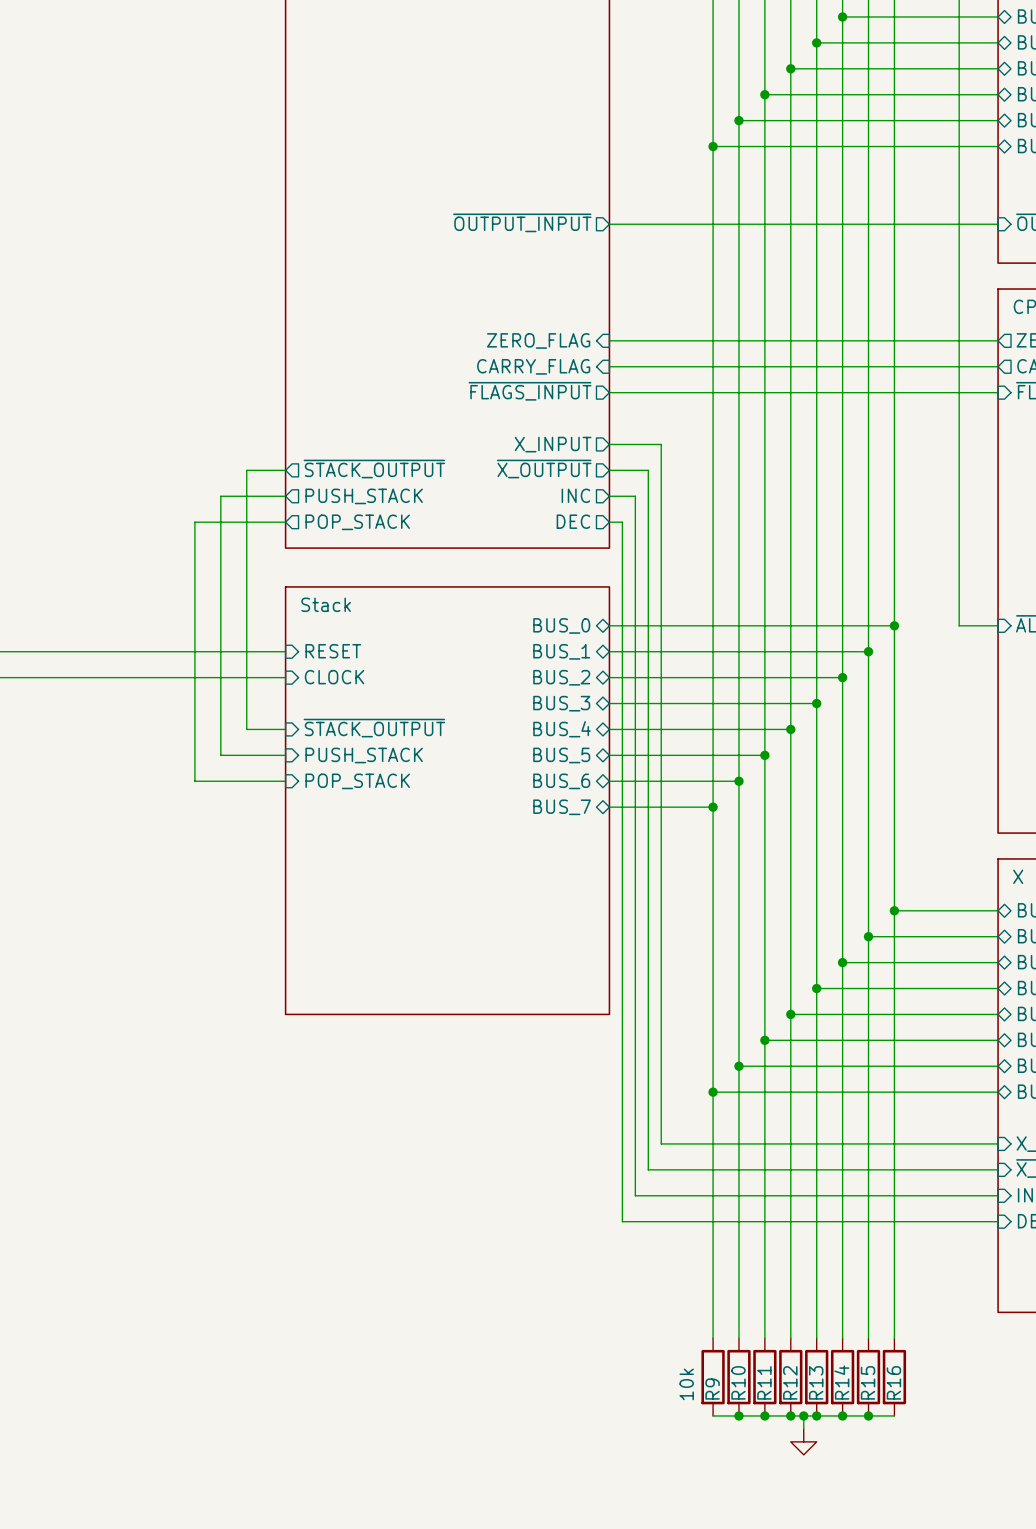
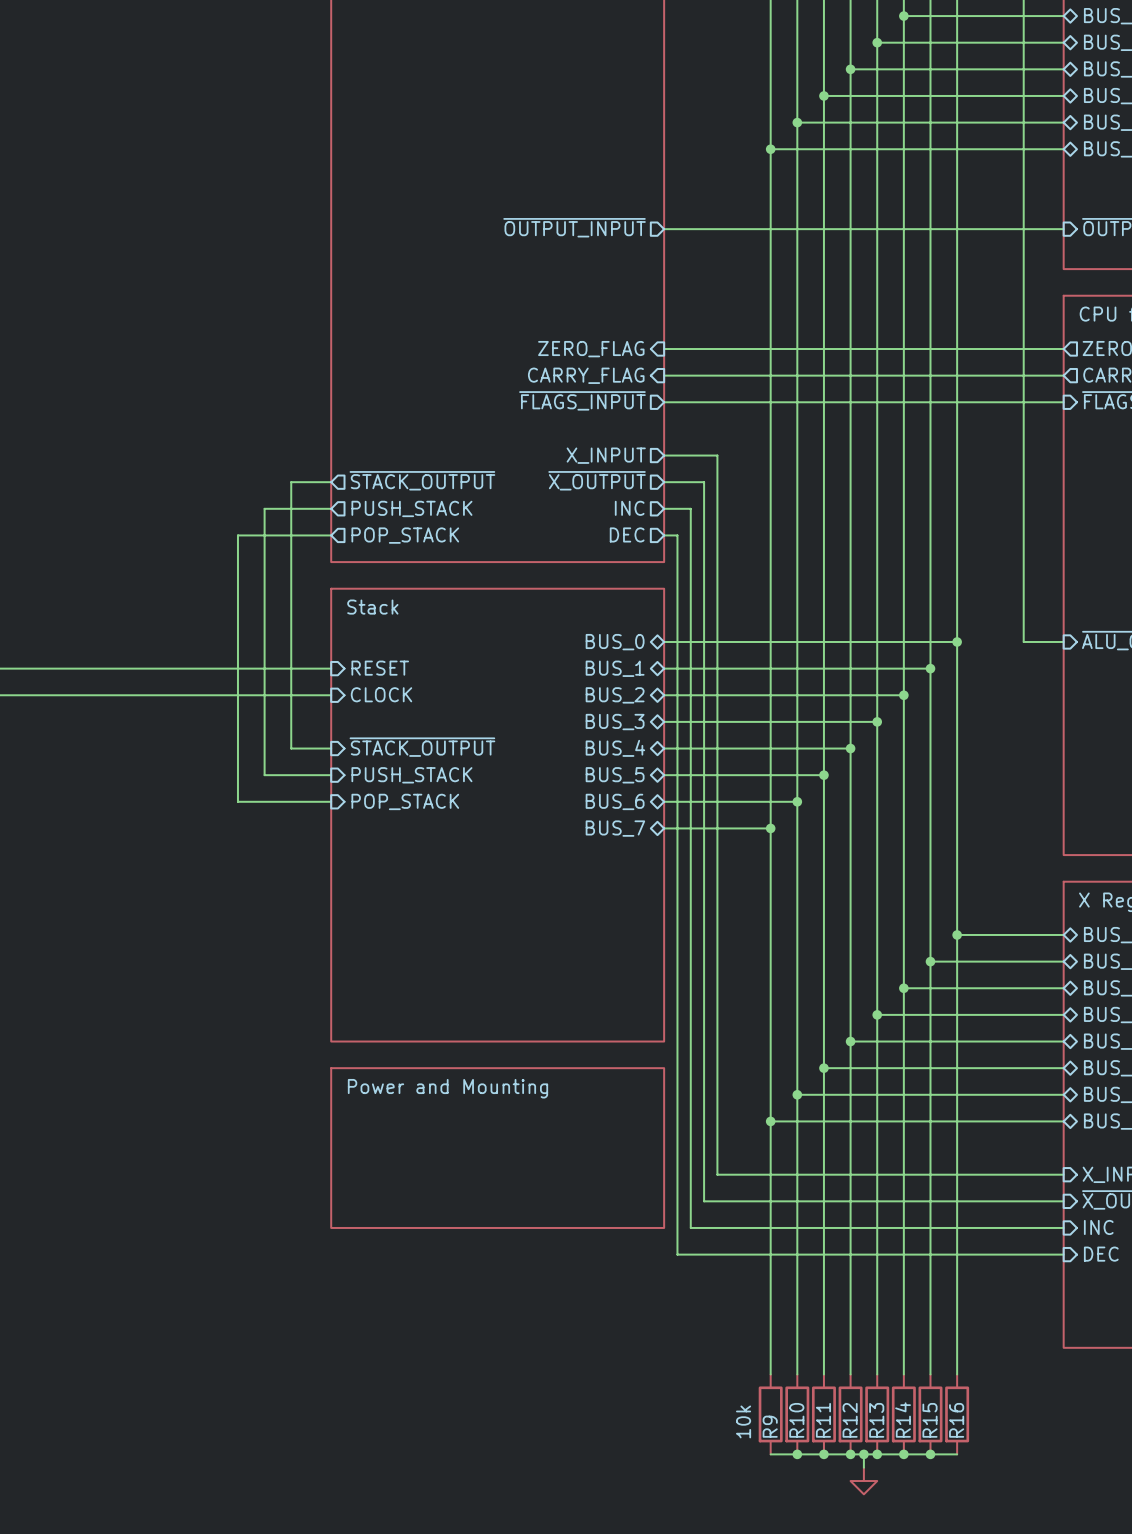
sheet Stack shape: [284, 586, 611, 1016] -> [330, 587, 665, 1043]
sheet Power and Mounting: none -> (497, 1148)

